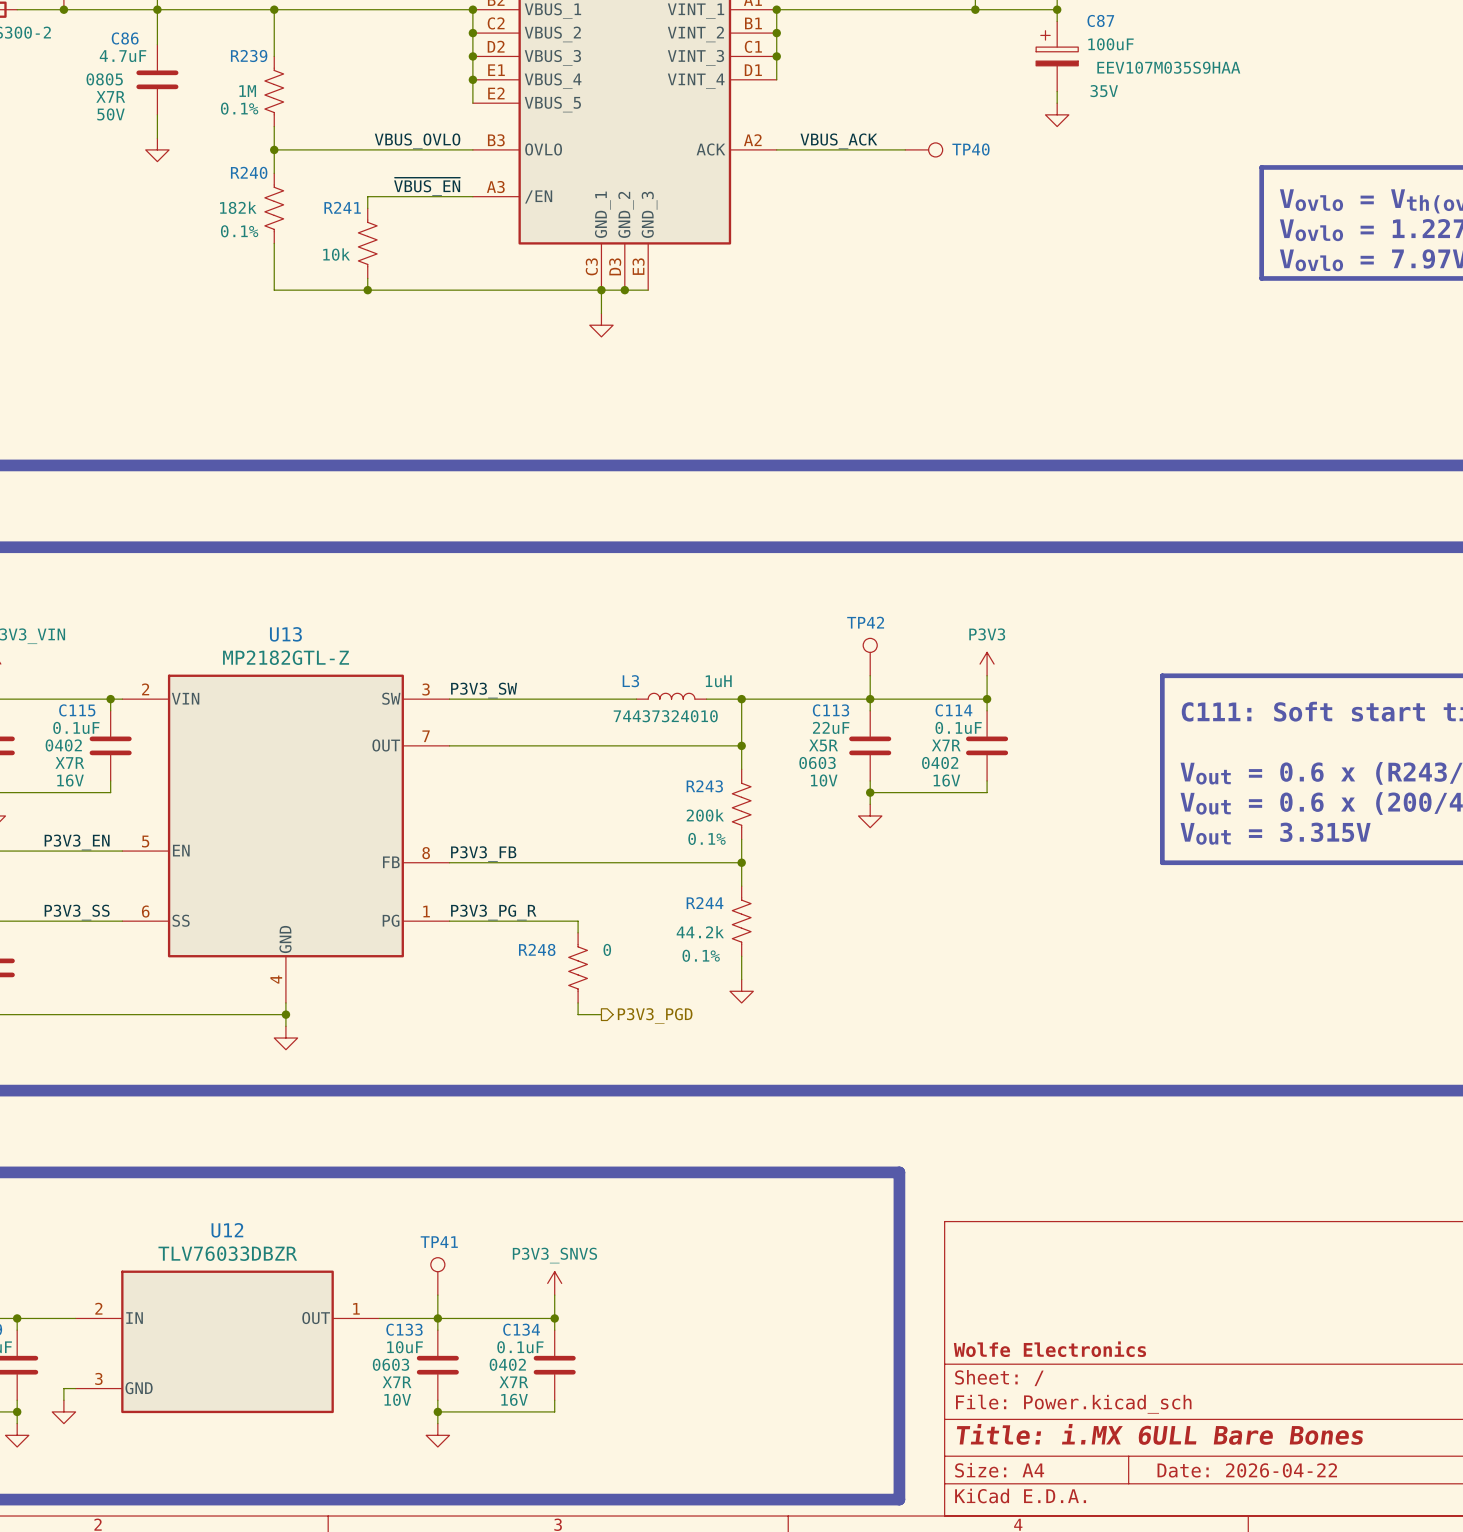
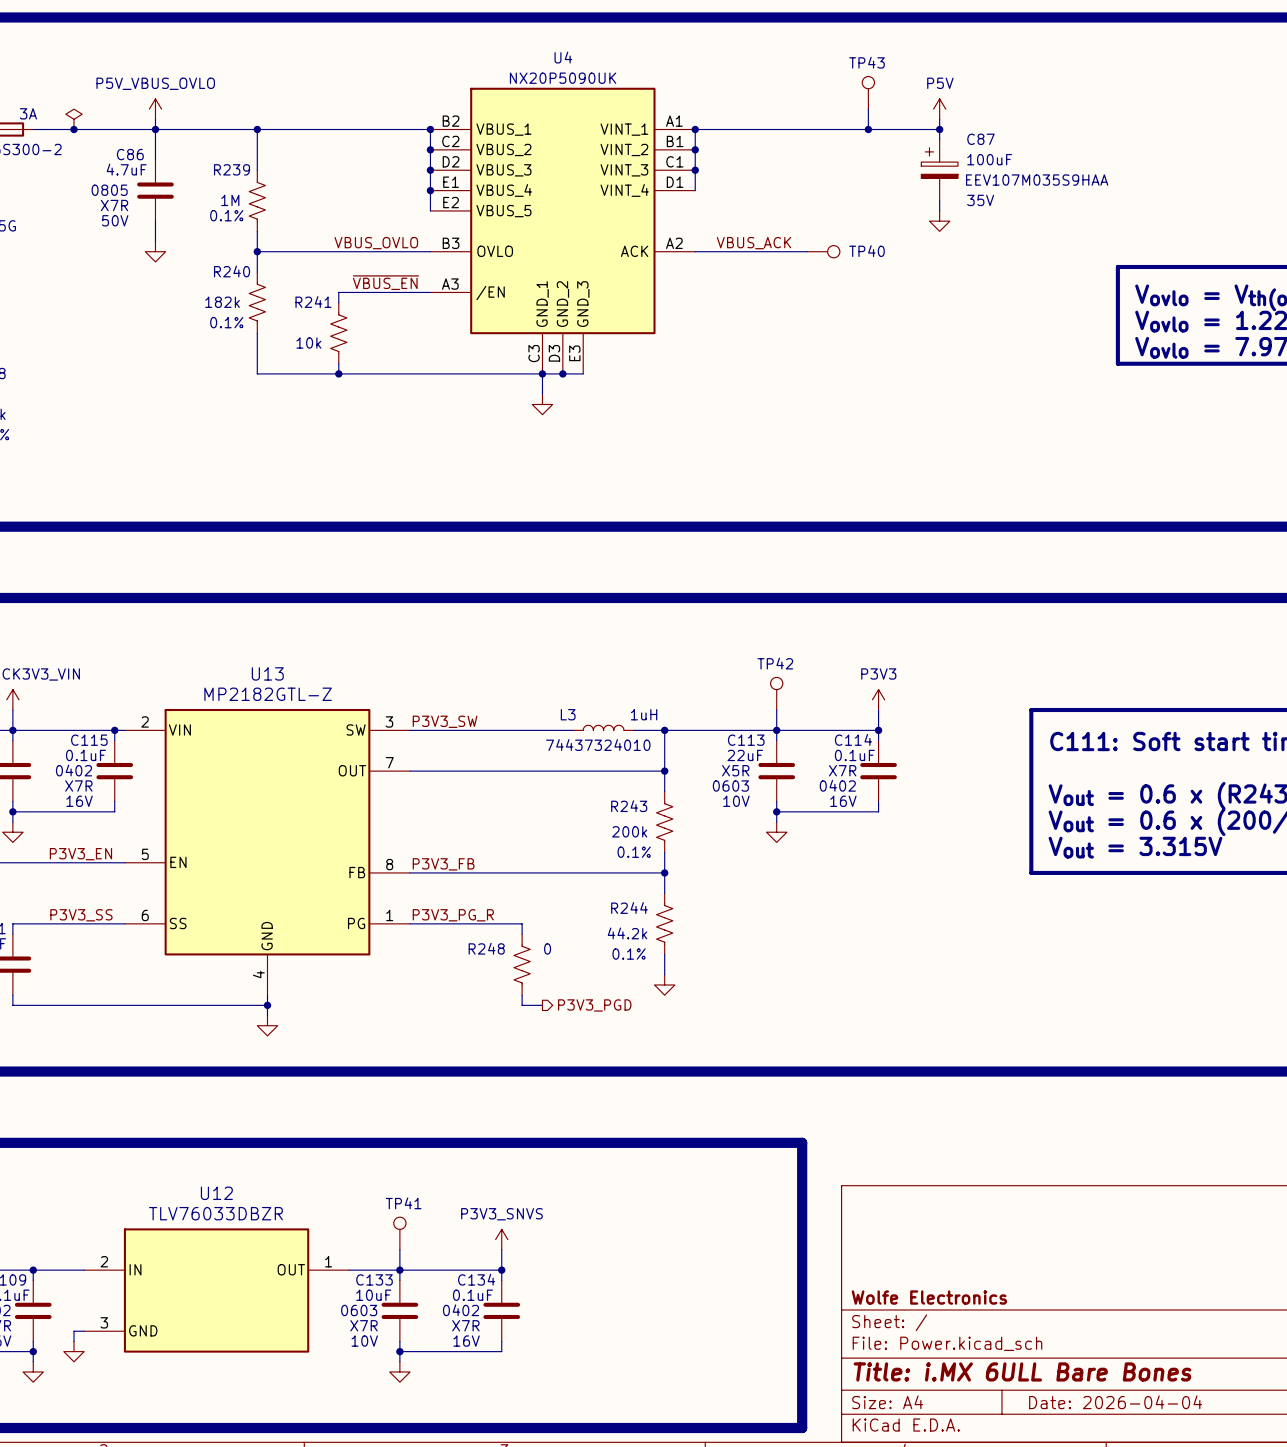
title block: Date: 2026-04-22 (1247, 1470) -> Date: 2026-04-04 (1115, 1402)

